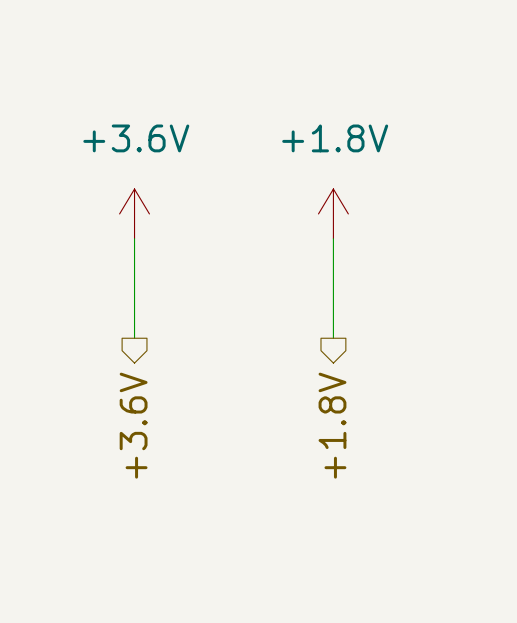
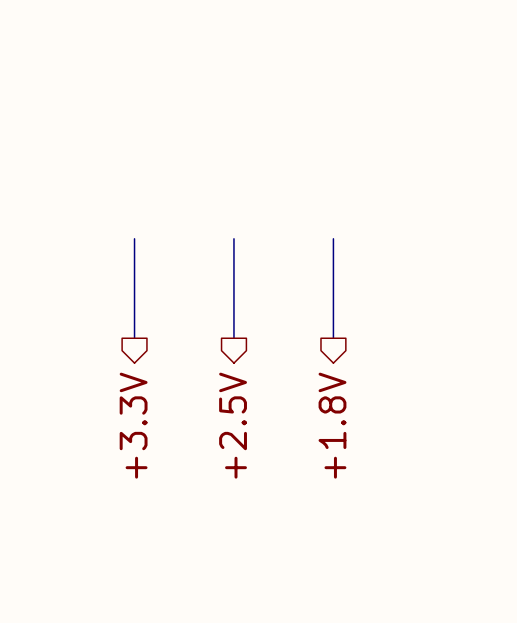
power symbol: +3.6V (134, 213) -> none
power symbol: +1.8V (333, 213) -> none
wire: none -> (233, 238) (233, 338)
hierarchical label: +3.6V (133, 425) -> +3.3V (133, 425)
hierarchical label: none -> +2.5V (233, 425)

